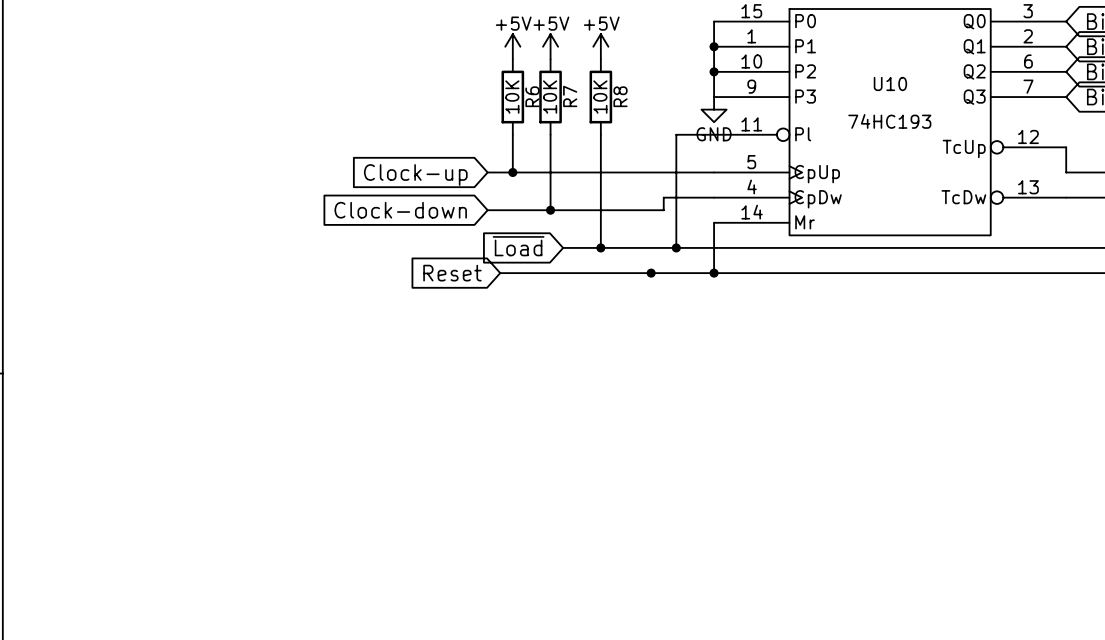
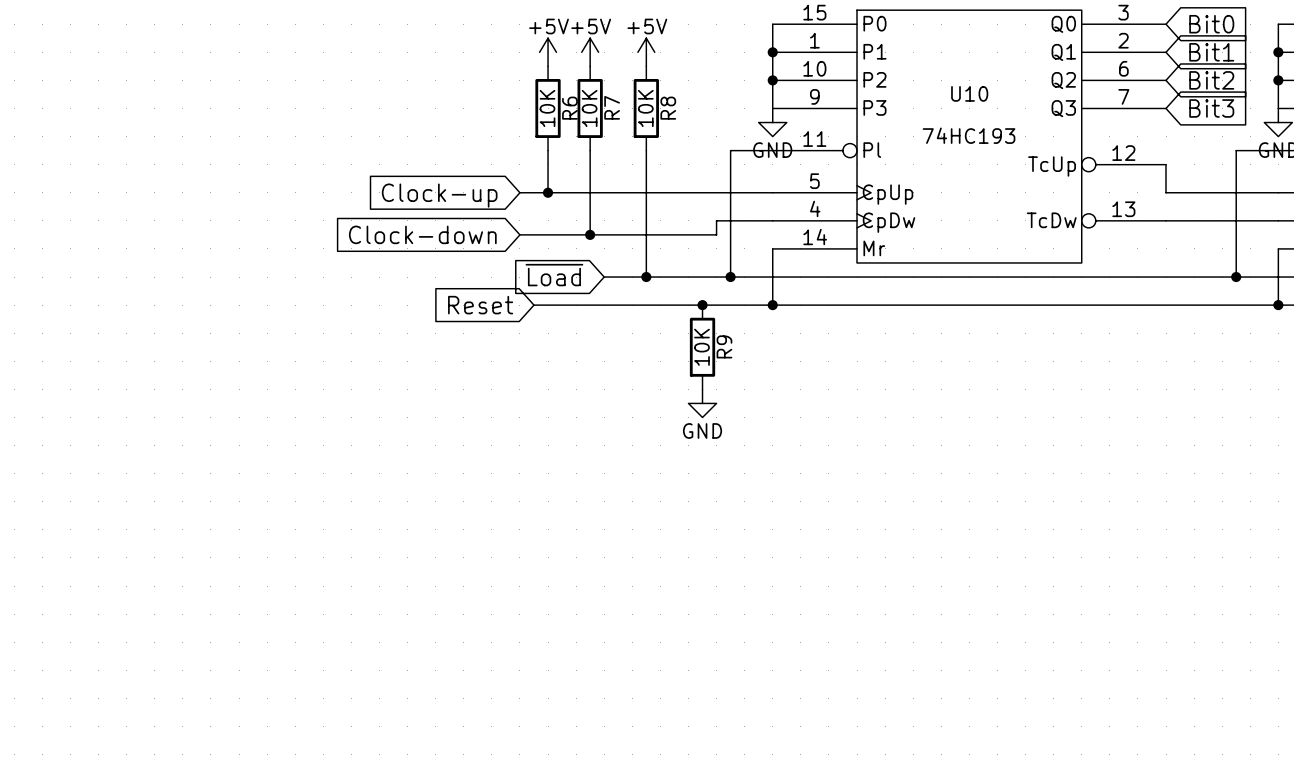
R9: none -> 10K (702, 347)
power symbol: none -> GND (702, 403)

